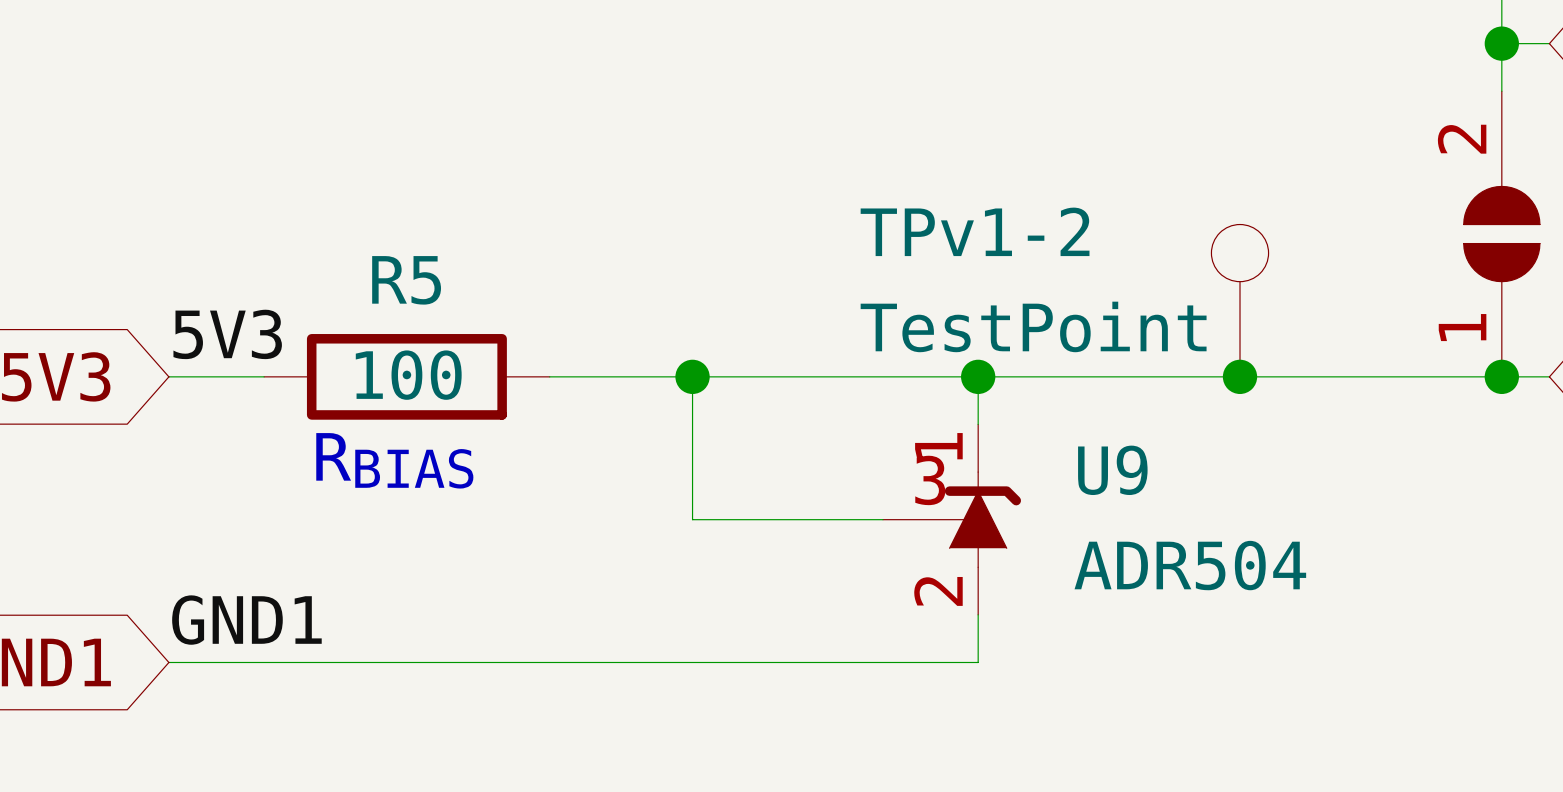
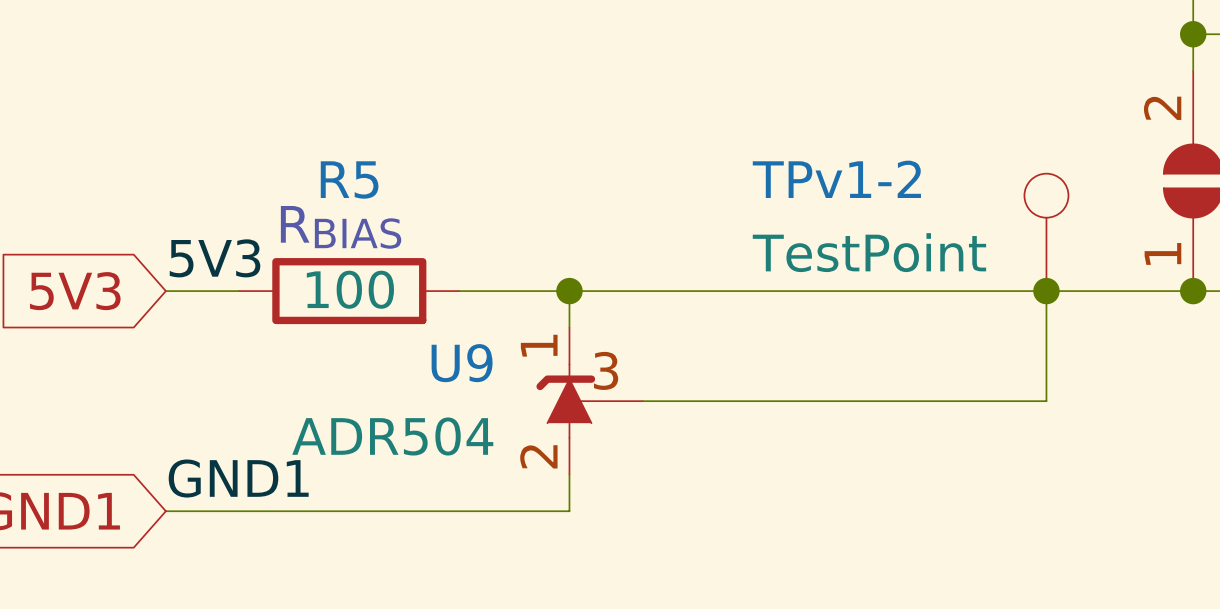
R5 name position: R5 (406, 280) -> R5 (349, 179)
TPv1-2 position: (1240, 300) -> (1046, 232)
wire: (978, 376) (978, 424) -> none
junction: (978, 376) -> none
junction position: (1240, 376) -> (1046, 291)
wire: none -> (1046, 291) (1046, 401) (716, 401)
text position: RBIAS (394, 460) -> RBIAS (341, 227)
U9 position: (951, 519) -> (589, 401)
U9 flip: as is (982, 519) -> left-right (565, 401)
wire: (978, 614) (978, 662) (692, 662) -> (569, 474) (569, 511)

